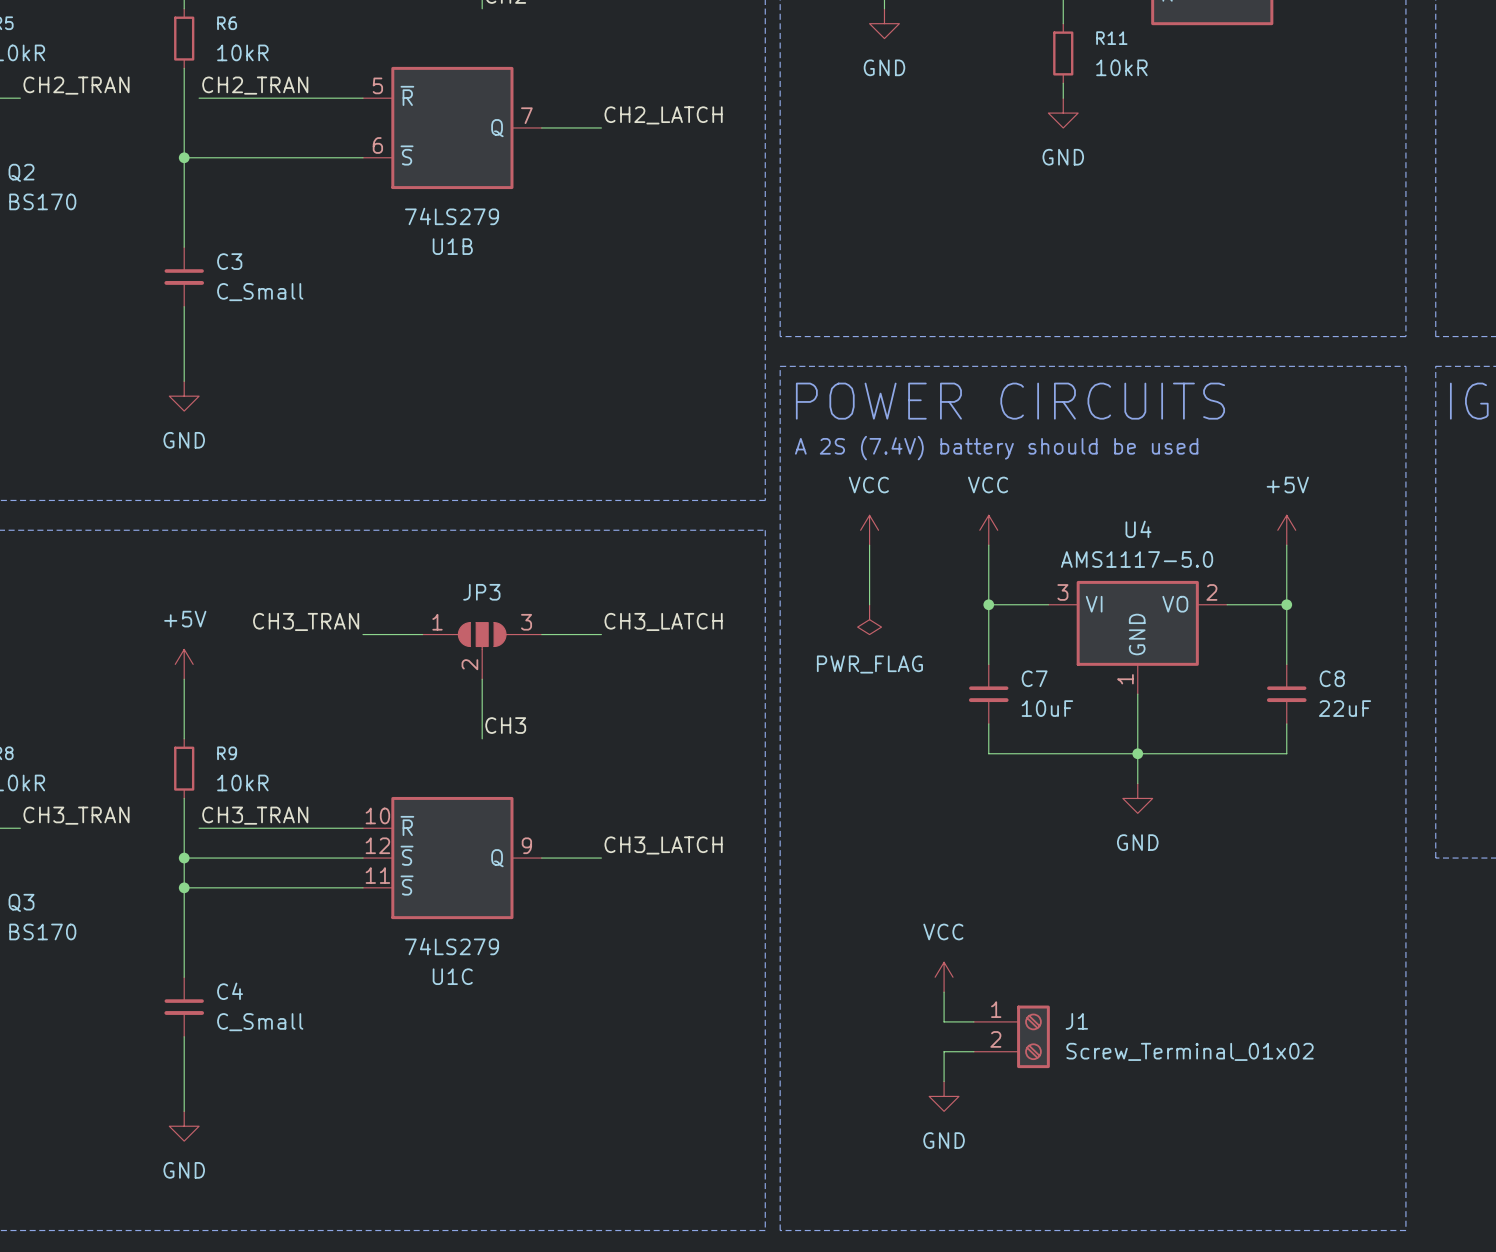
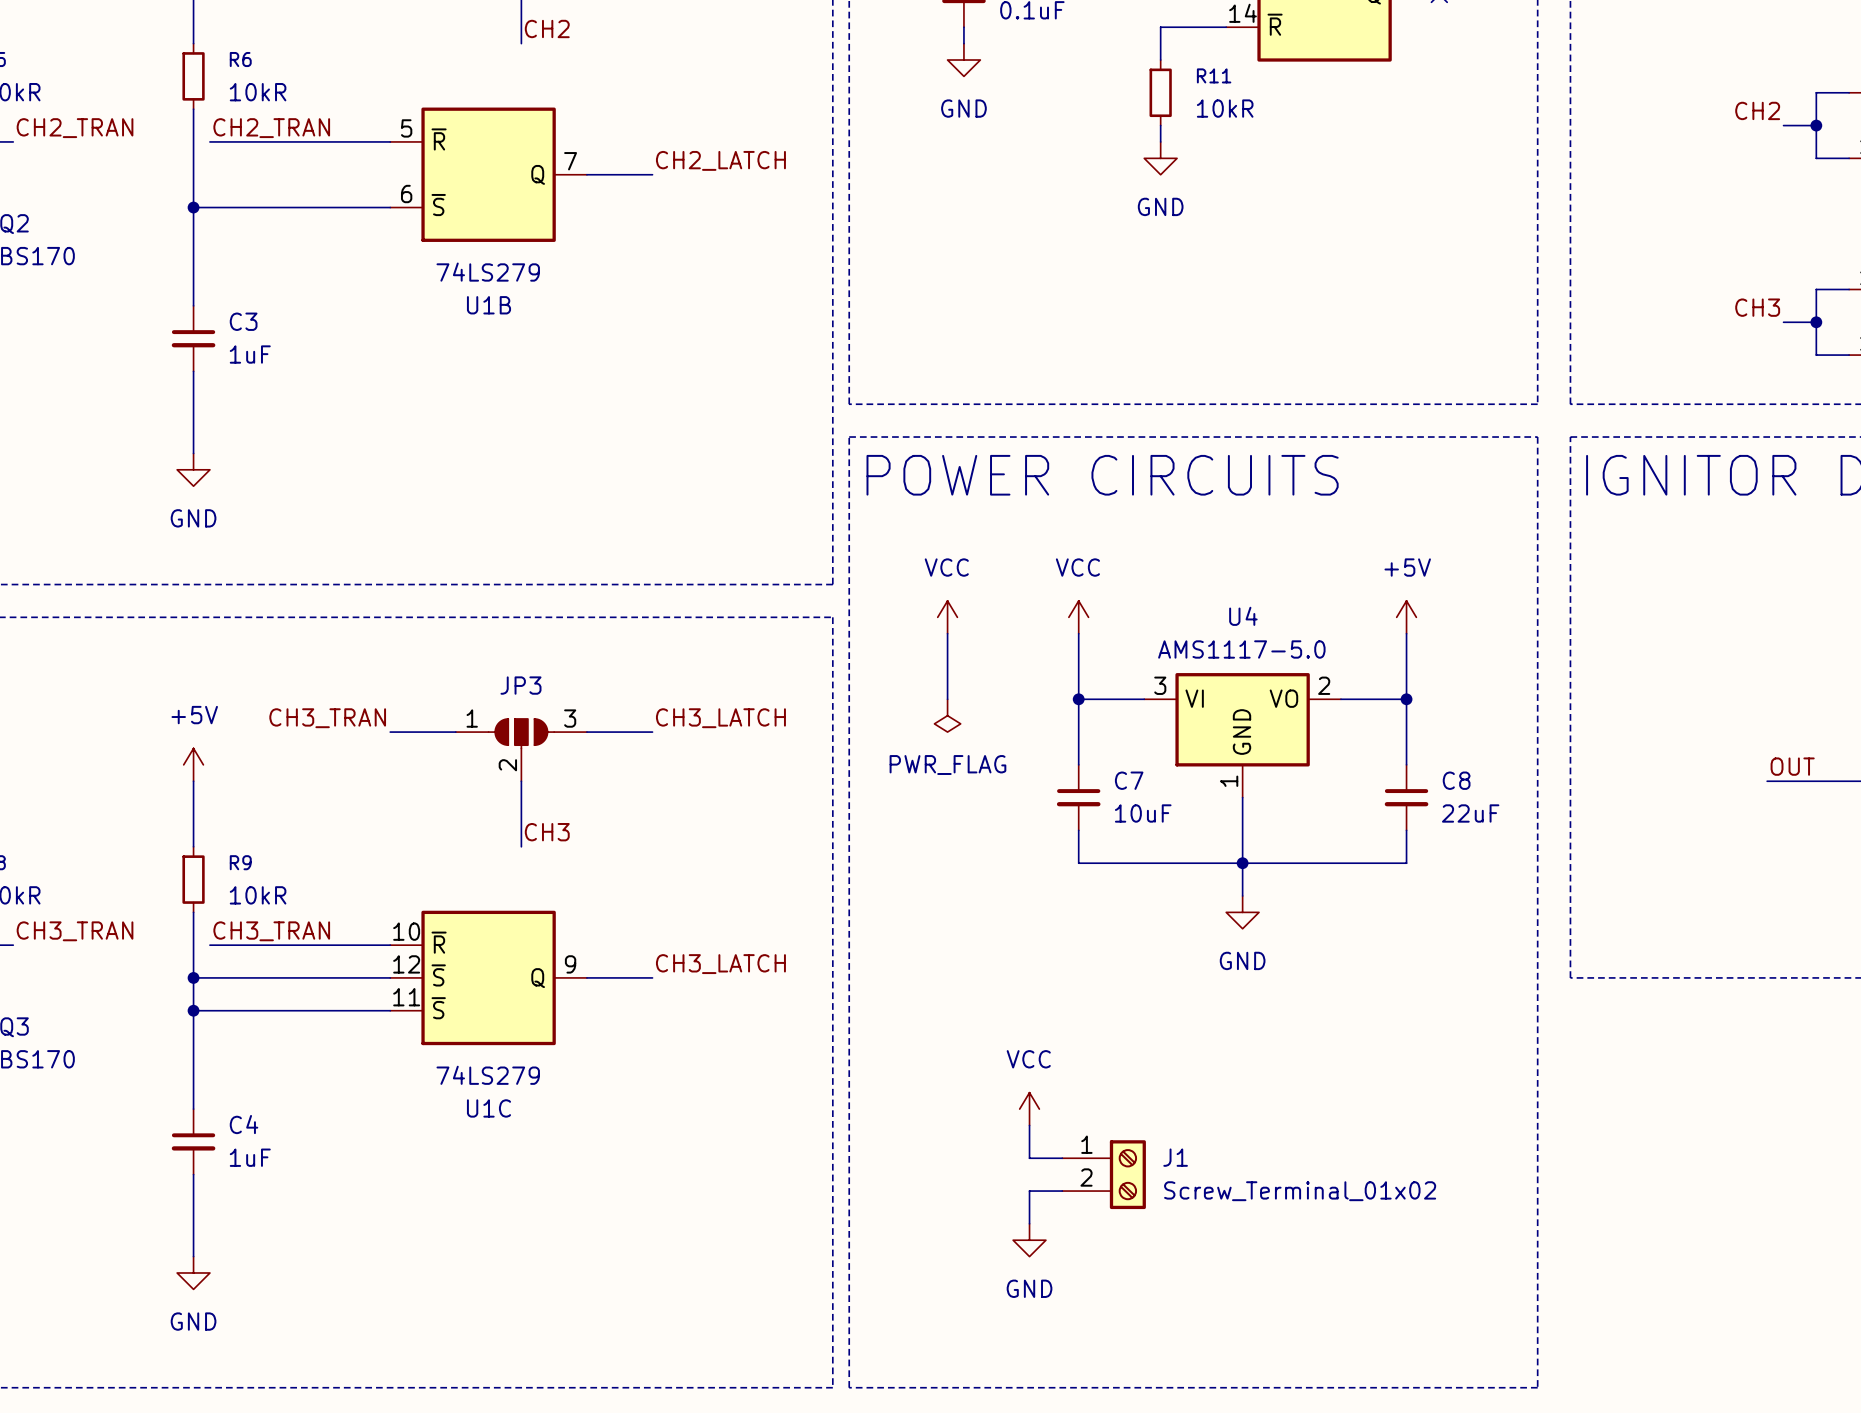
C3 value: C_Small (260, 292) -> 1uF (250, 354)
text: A 2S (7.4V) battery should be used (996, 448) -> none
C4 value: C_Small (260, 1022) -> 1uF (250, 1157)

